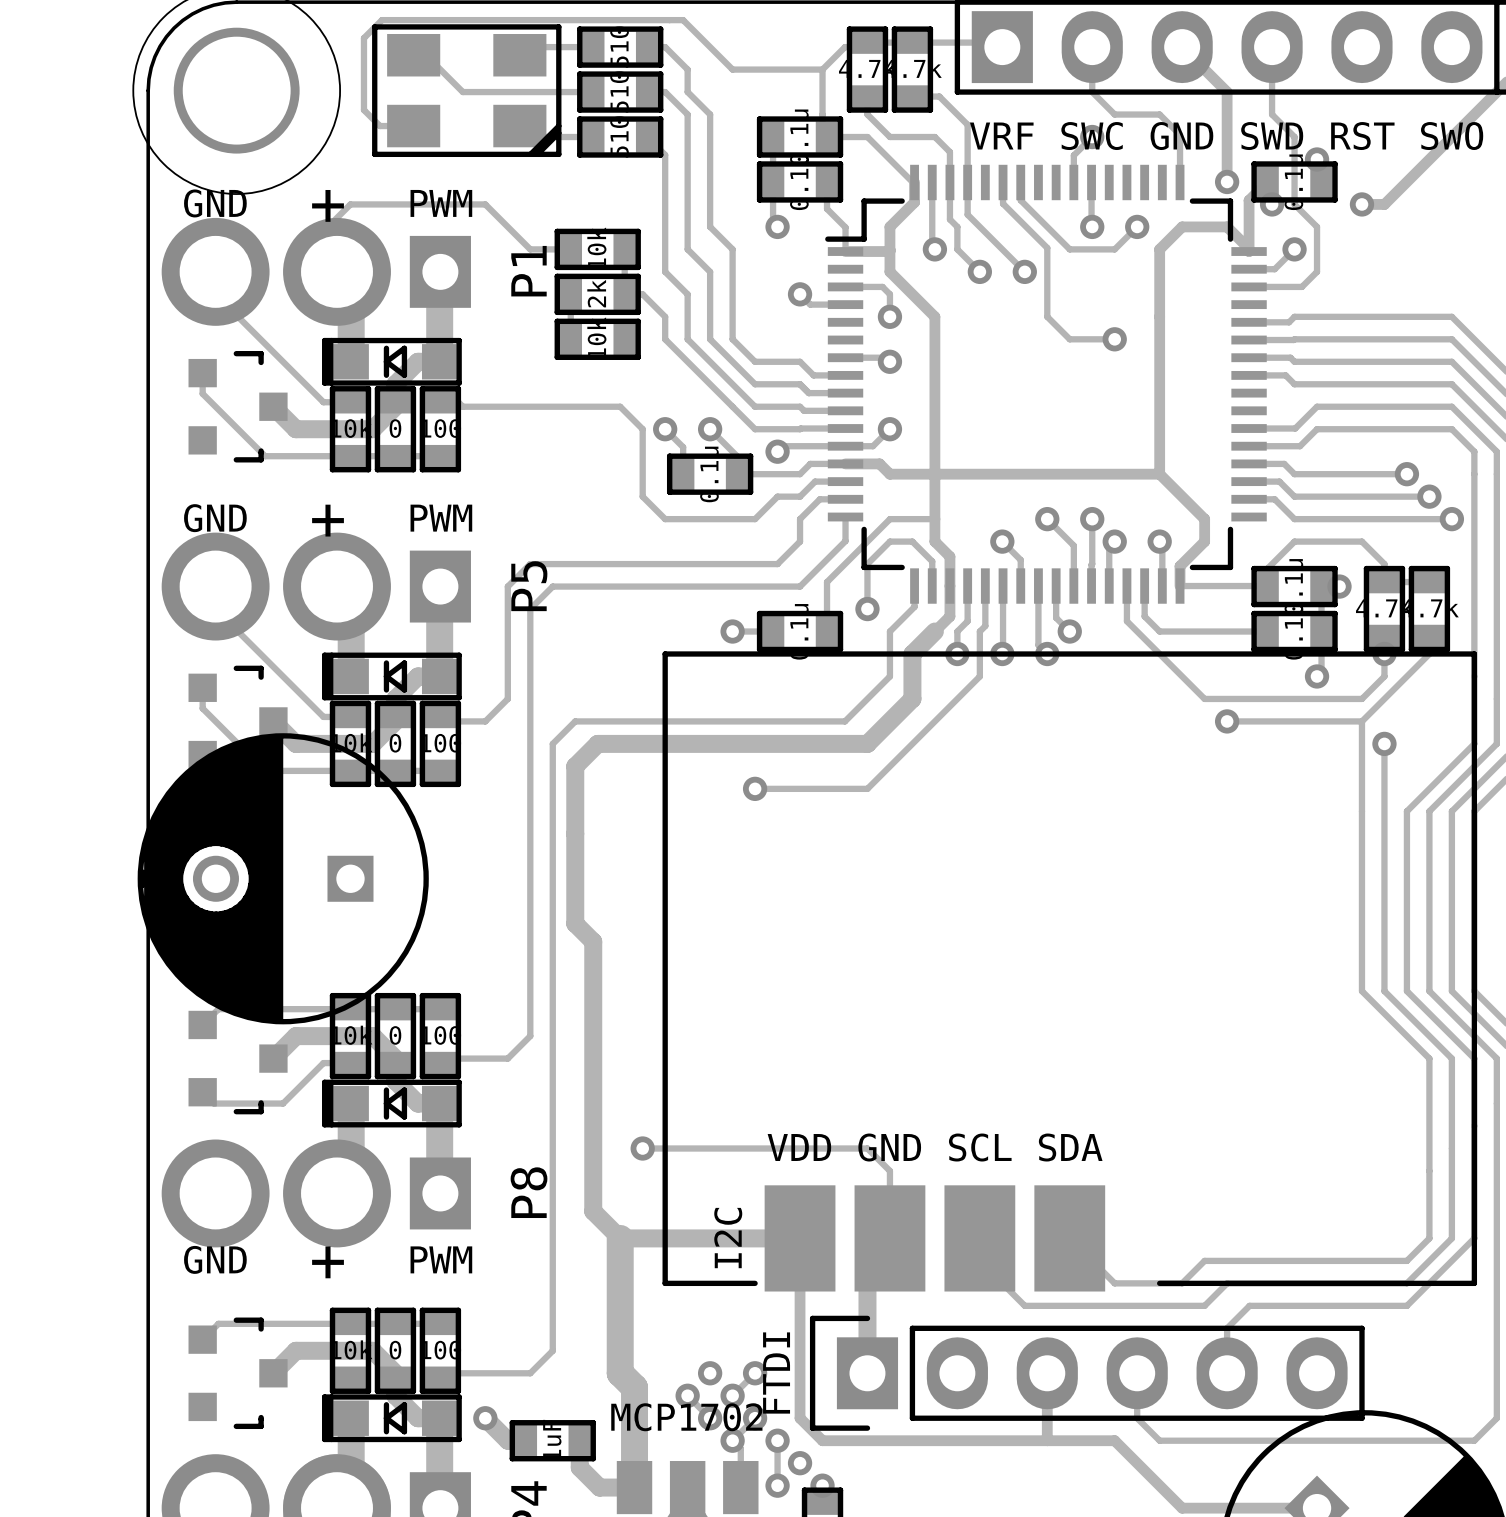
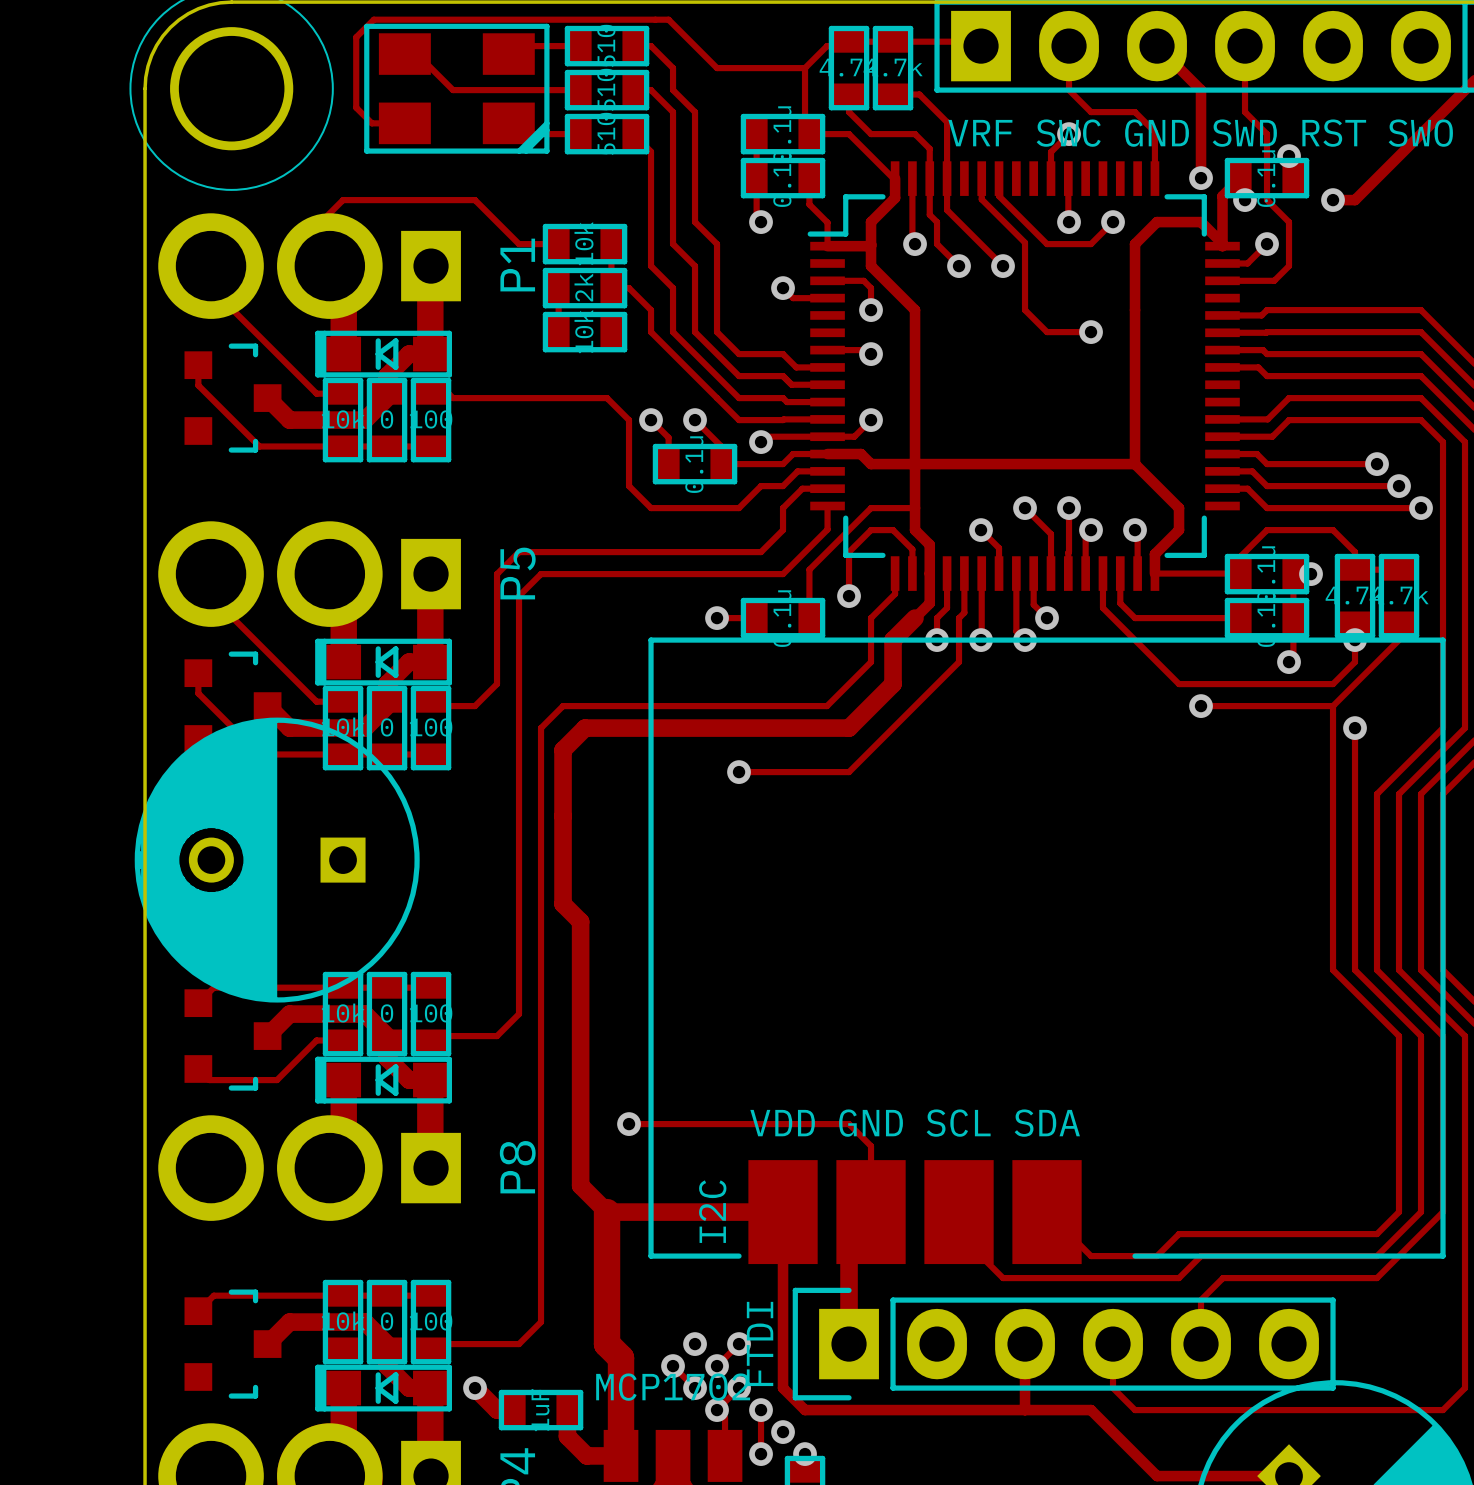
P1 text: GND (215, 203) -> none
P1 text: PWM (441, 203) -> none
P1 text: + (328, 205) -> none
P5 text: GND (215, 518) -> none
P5 text: PWM (441, 518) -> none
P5 text: + (328, 520) -> none
P8 text: GND (215, 1259) -> none
P8 text: PWM (441, 1259) -> none
P8 text: + (328, 1262) -> none

